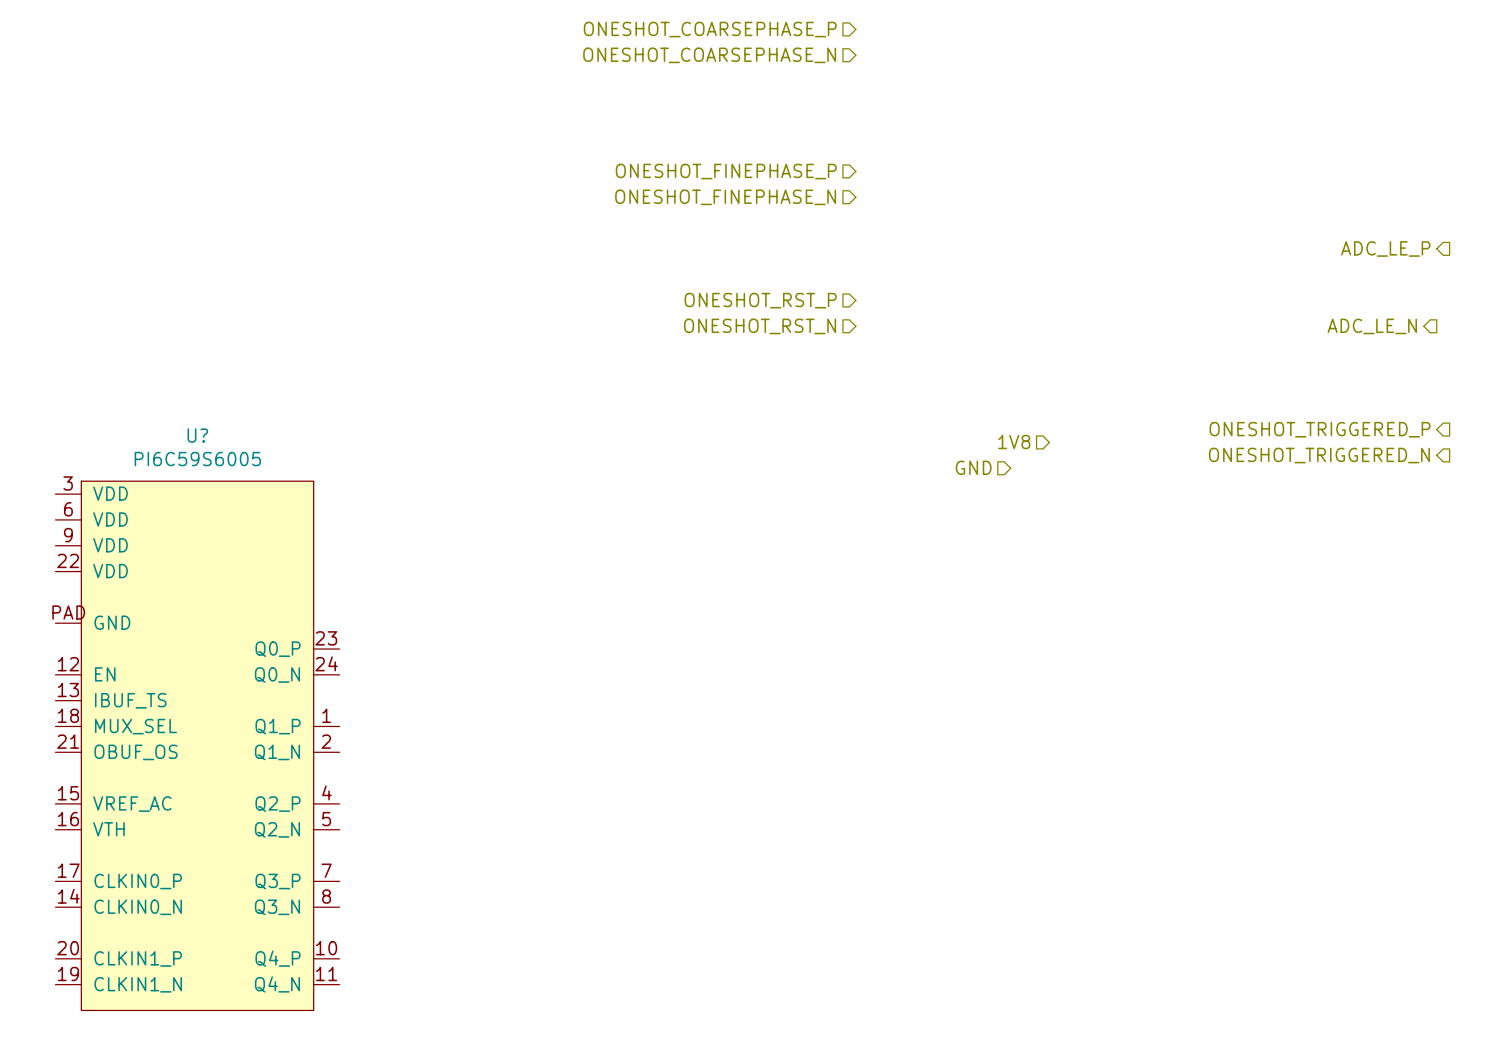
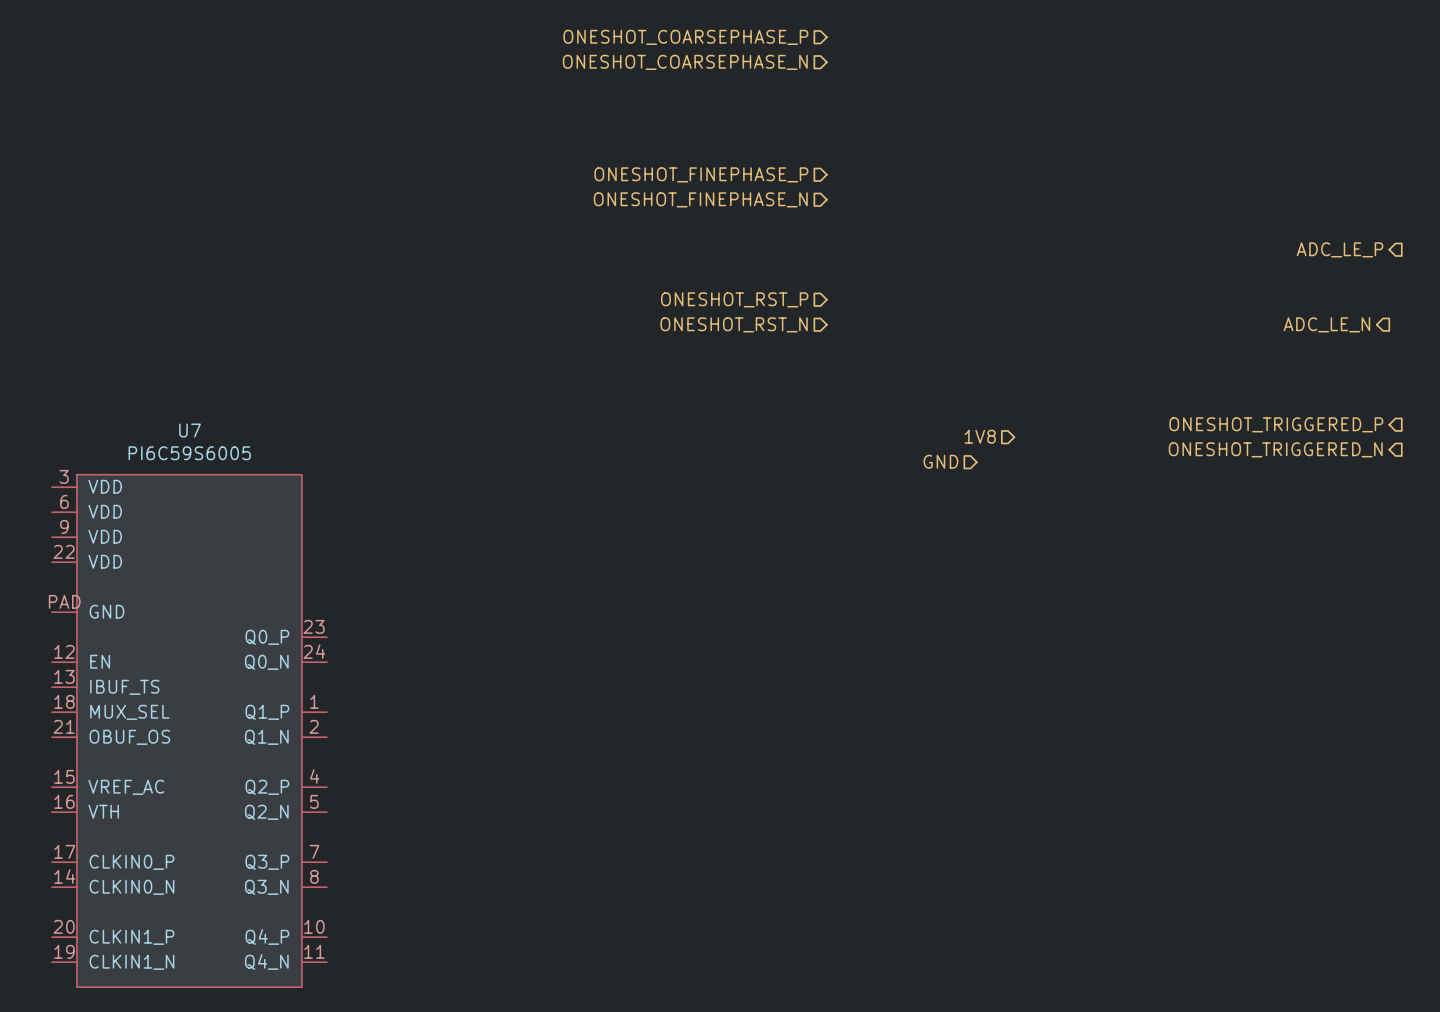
U? name: U? (197, 435) -> U7 (190, 430)

